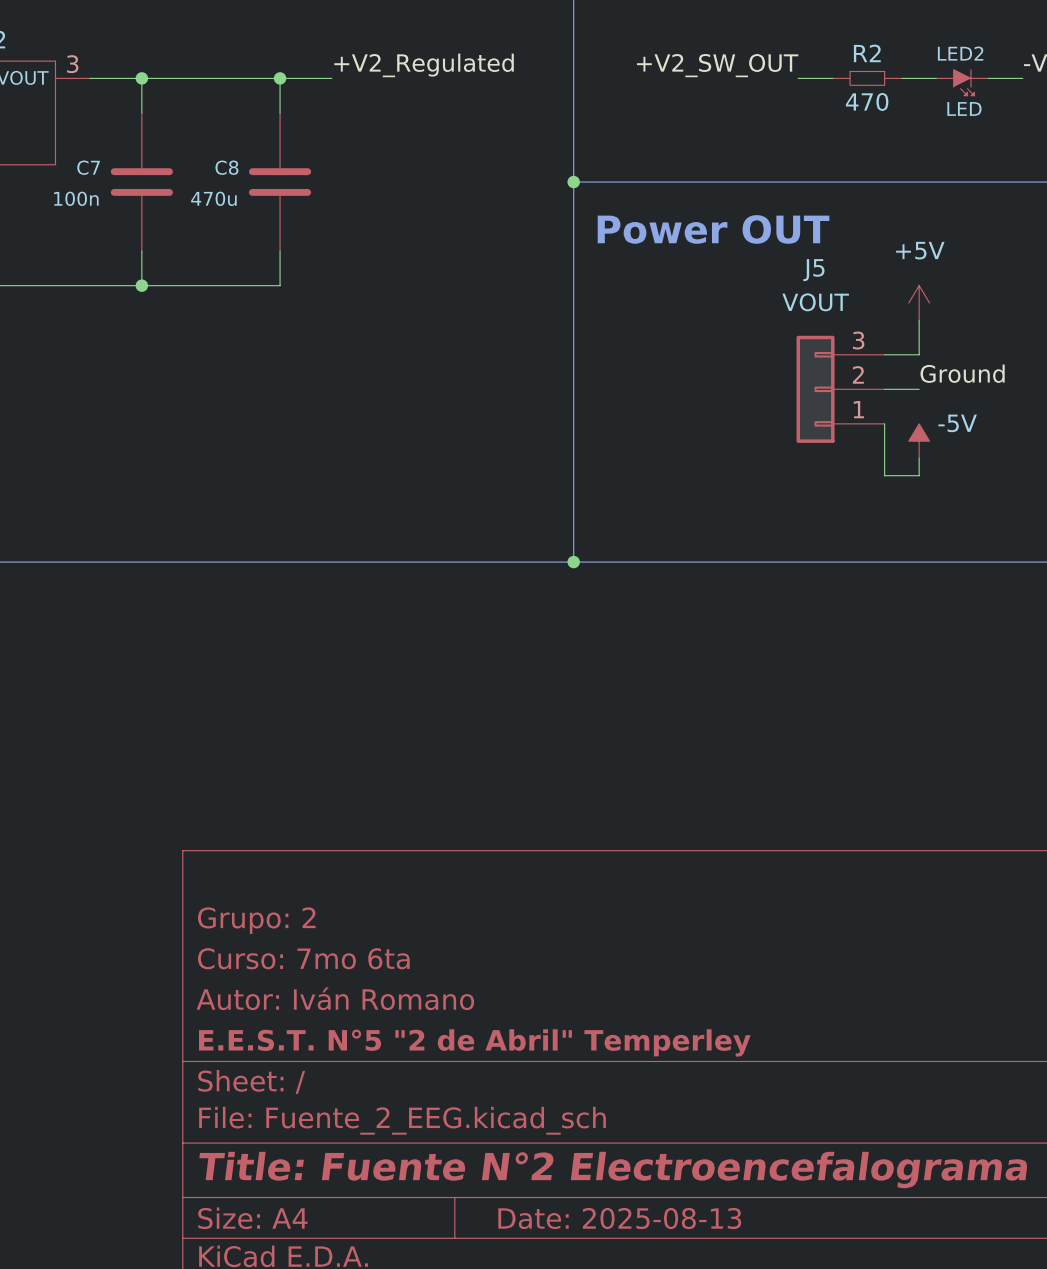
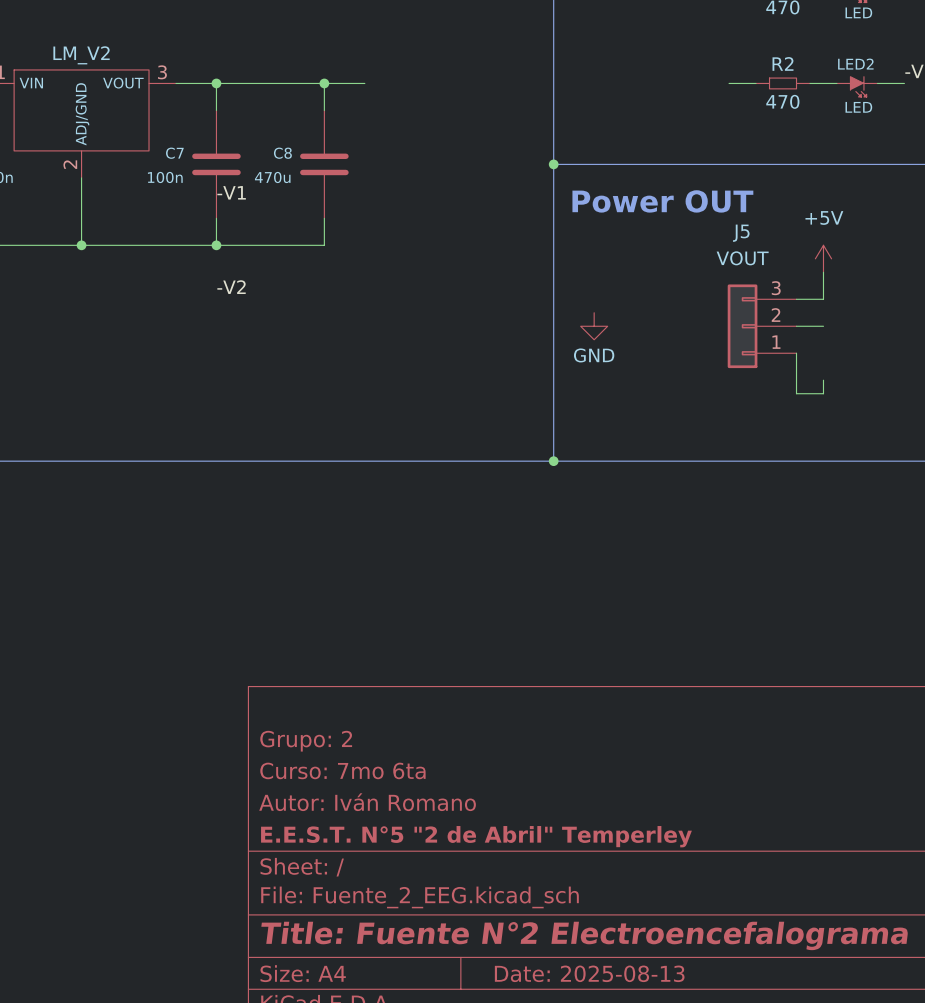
label: +V2_Regulated (424, 65) -> none
label: +V2_SW_OUT (717, 65) -> none
label: none -> -V1 (231, 192)
label: none -> -V2 (231, 287)
label: Ground (962, 373) -> none
power symbol: none -> GND (594, 326)
power symbol: -5V (919, 441) -> none

